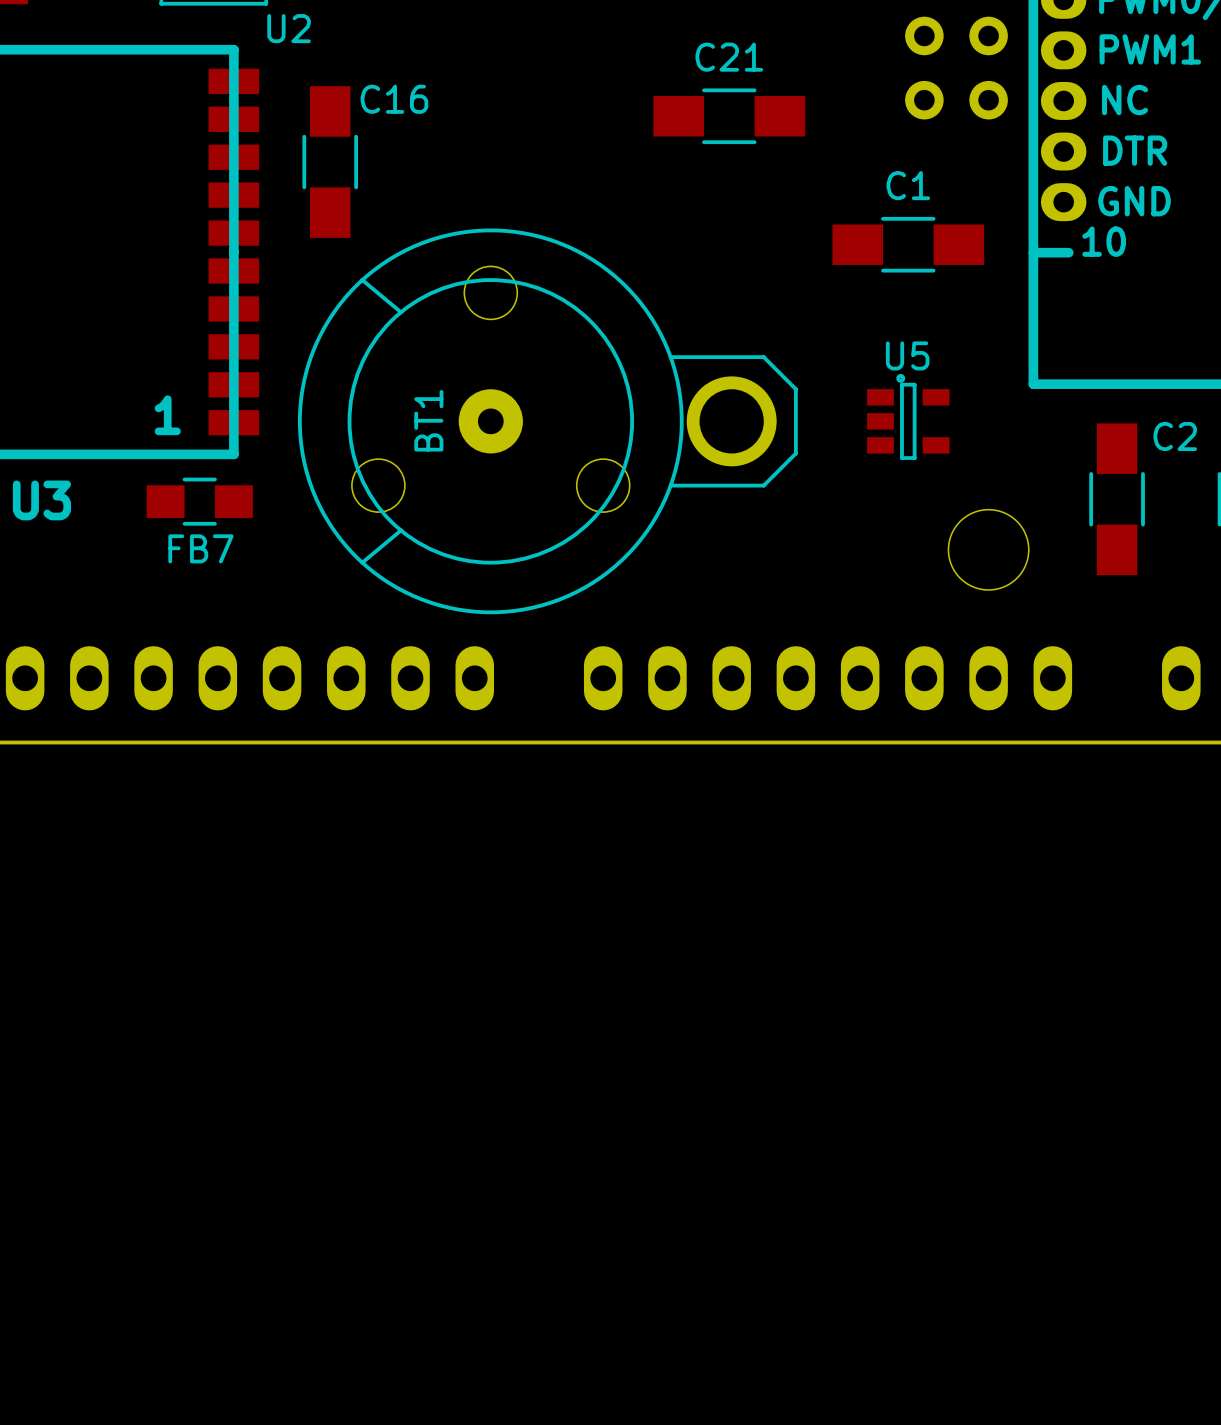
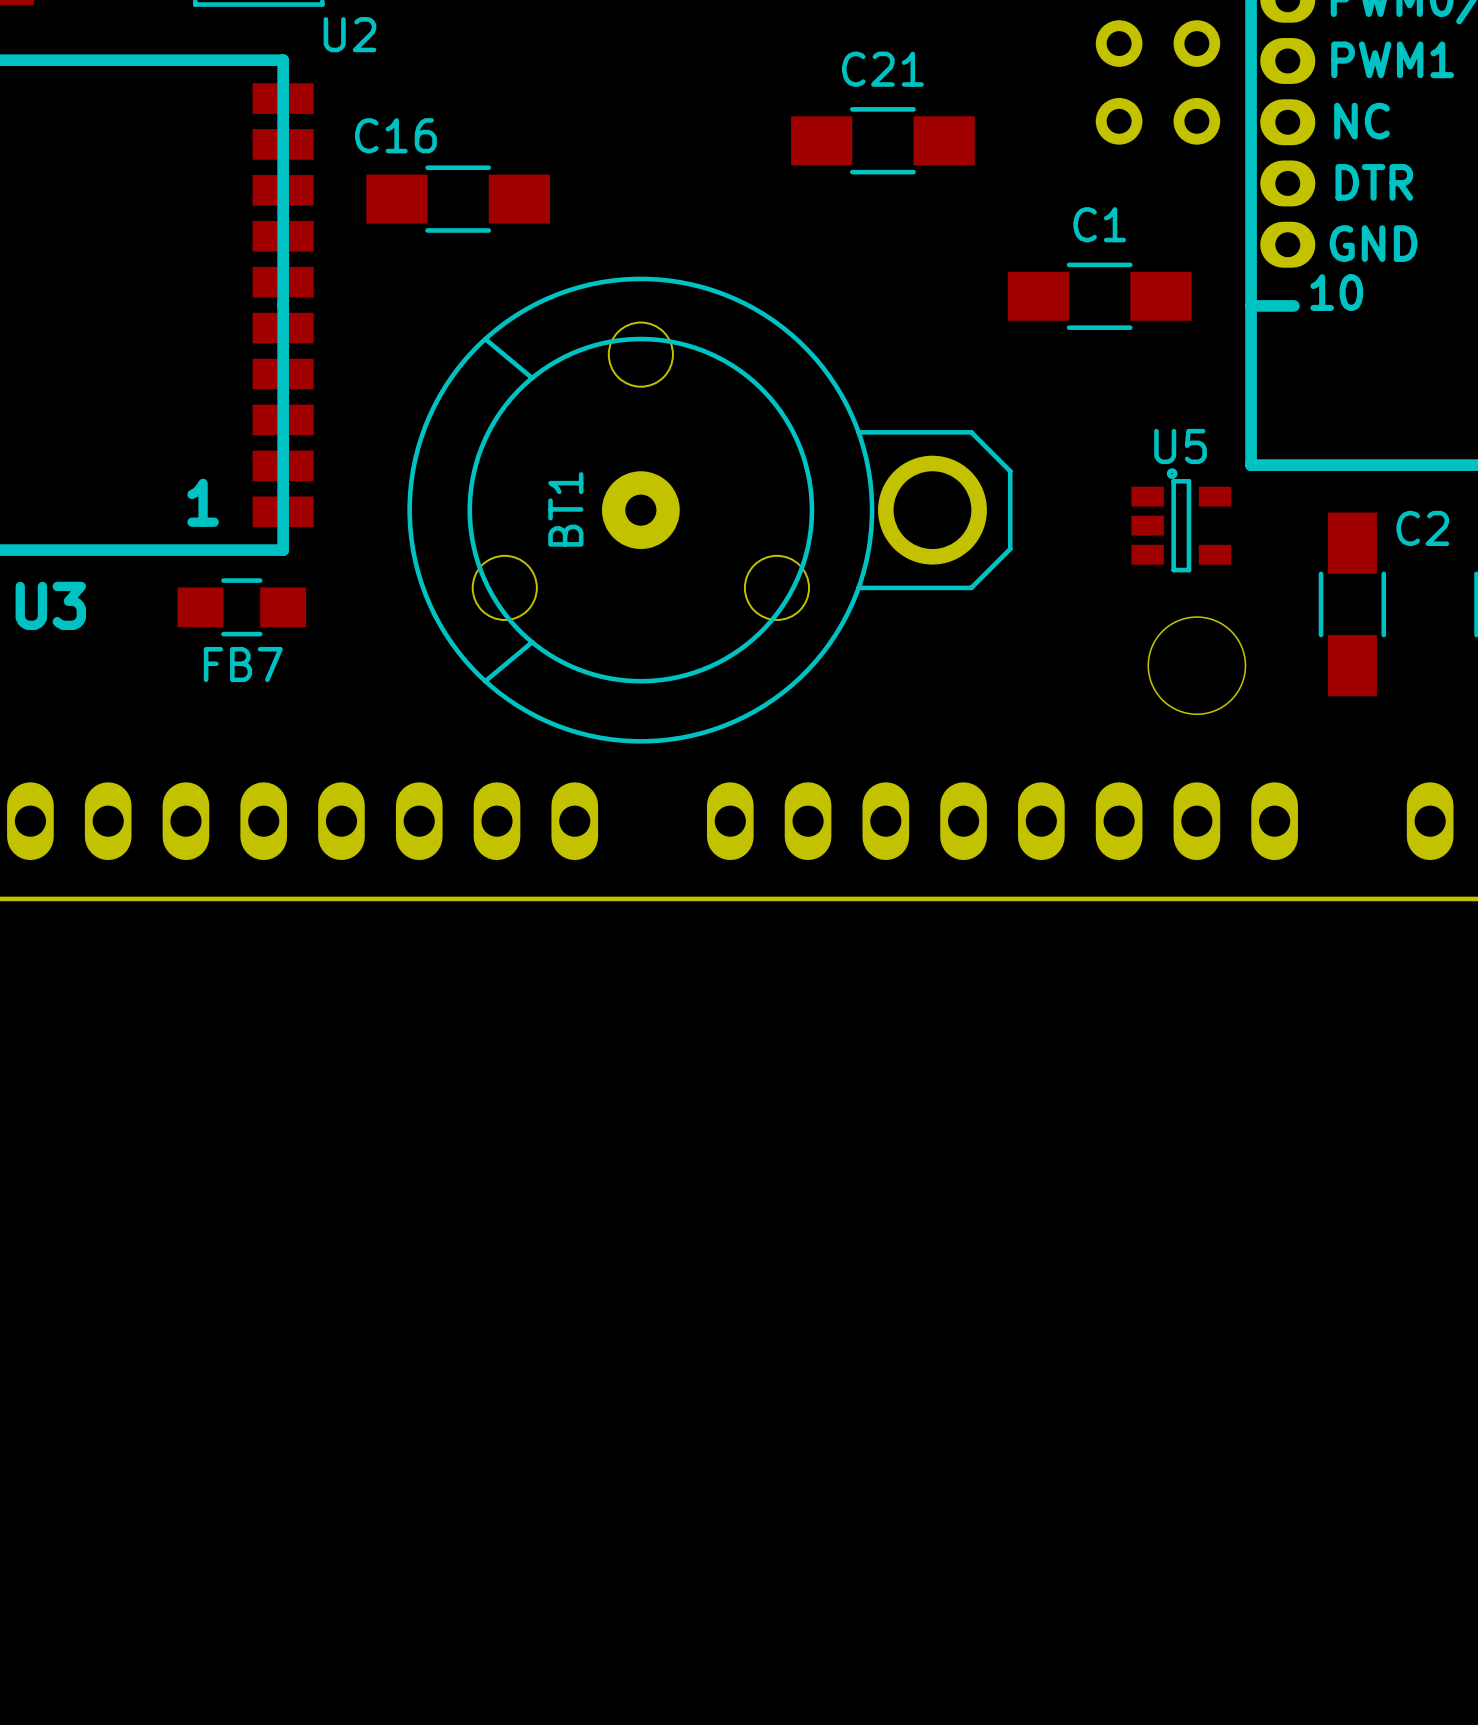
C16 name position: C16 (394, 99) -> C16 (395, 135)
C16 rotation: 0° (330, 162) -> 90° clockwise (458, 199)
U5 position: (908, 416) -> (1181, 520)
BT1 position: (547, 421) -> (709, 510)

